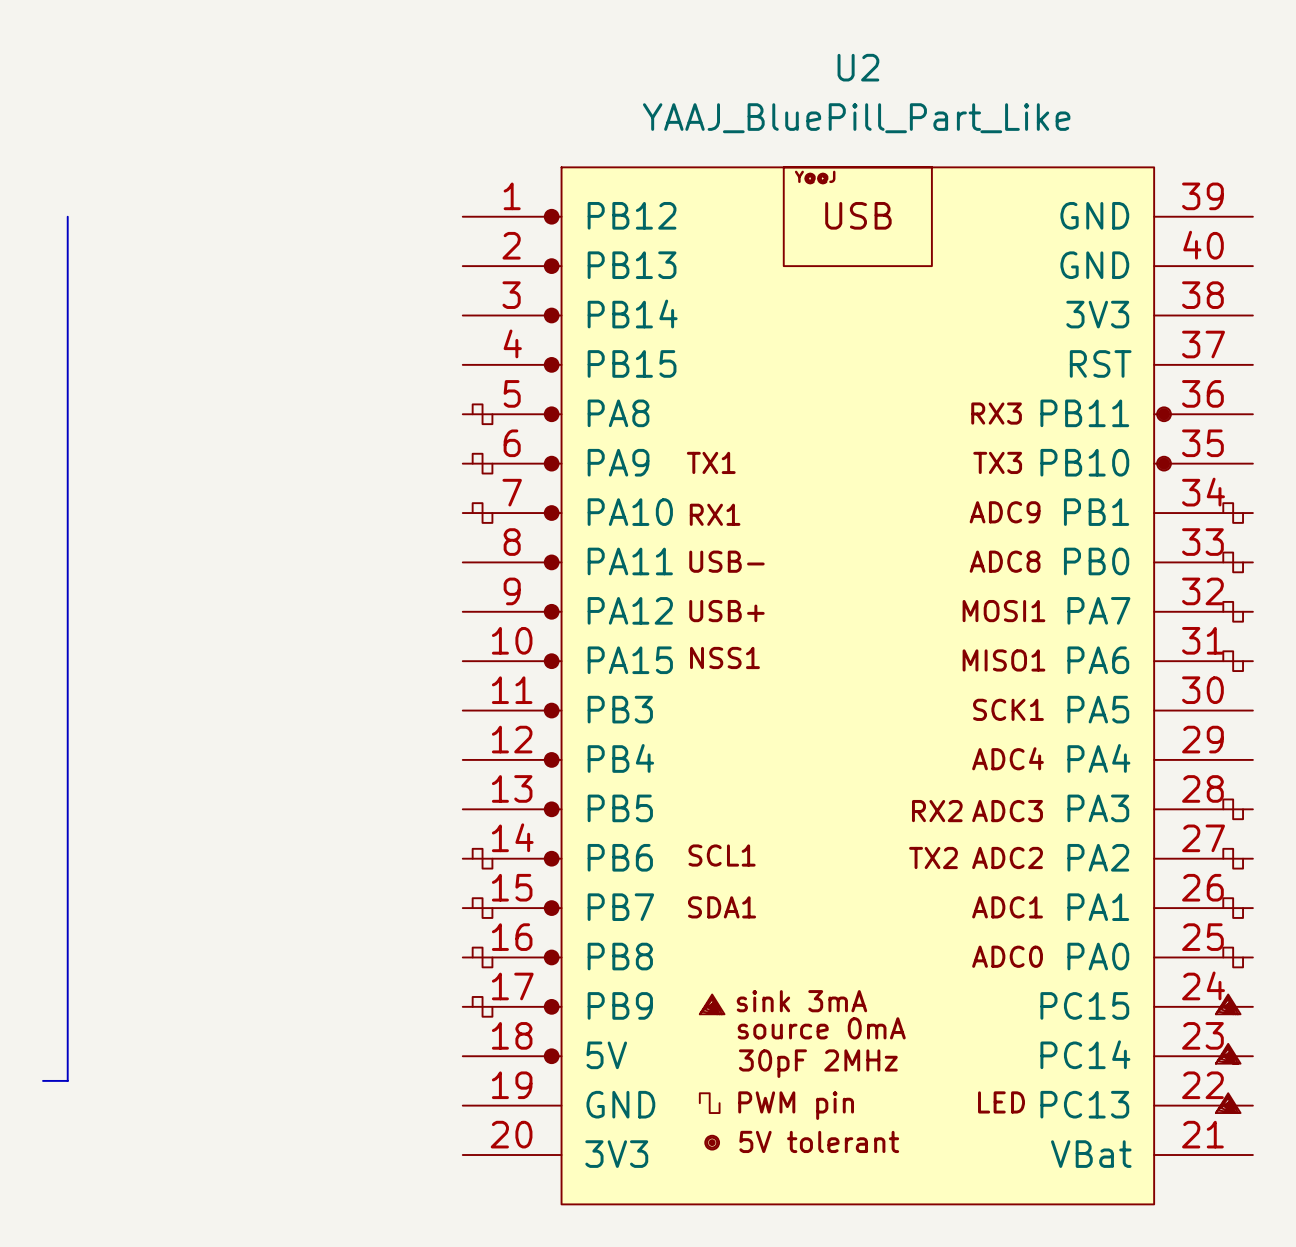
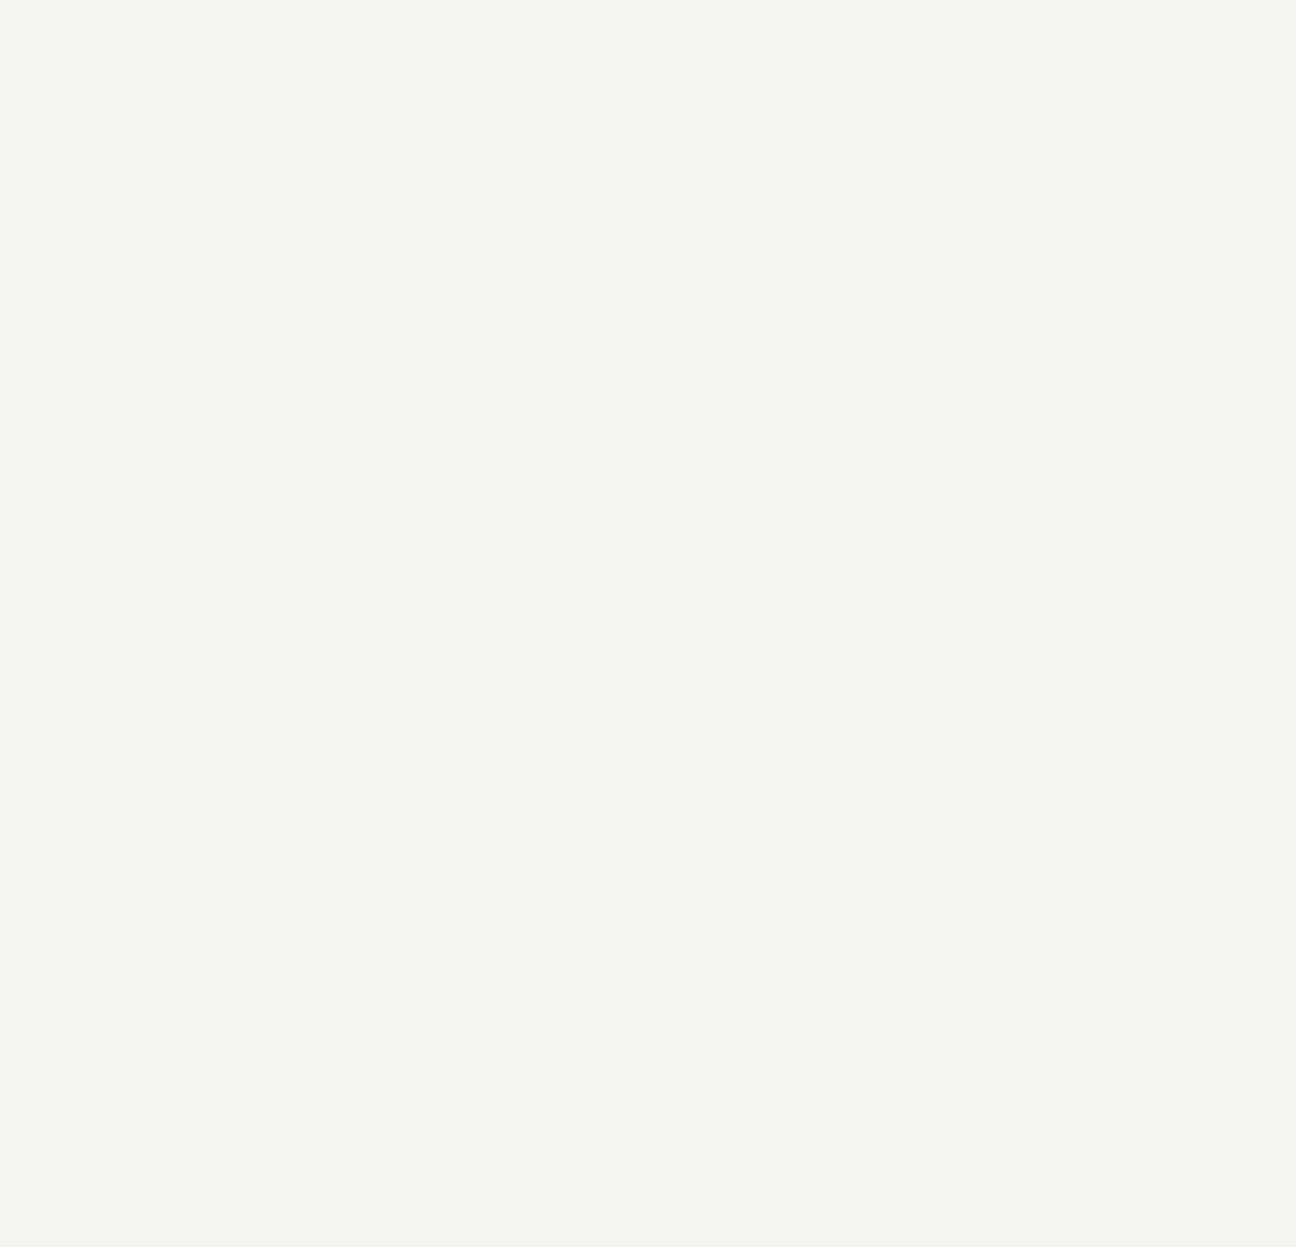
bus: (67, 216) (67, 1080) (43, 1080) -> none
U2: YAAJ_BluePill_Part_Like (857, 685) -> none

